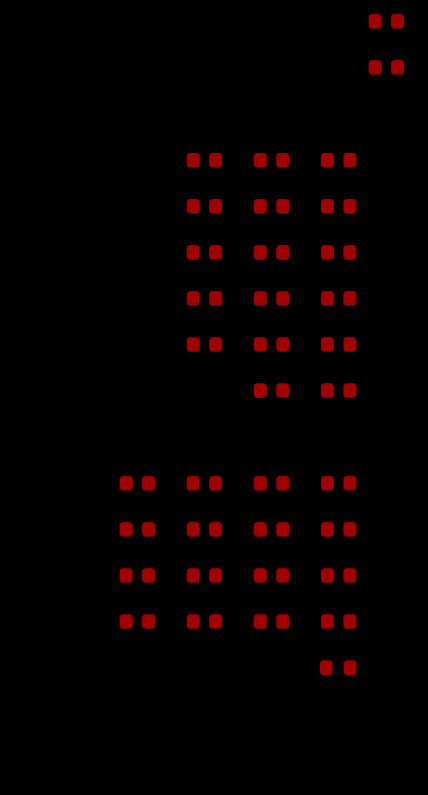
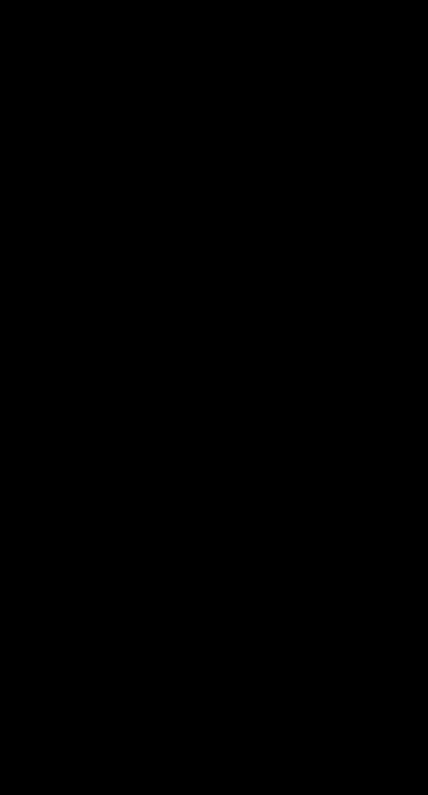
part: (386, 21) -> none
part: (386, 67) -> none
part: (204, 160) -> none
part: (271, 160) -> none
part: (338, 160) -> none
part: (204, 206) -> none
part: (271, 206) -> none
part: (338, 206) -> none
part: (204, 252) -> none
part: (271, 252) -> none
part: (338, 252) -> none
part: (204, 298) -> none
part: (271, 298) -> none
part: (338, 298) -> none
part: (204, 344) -> none
part: (271, 344) -> none
part: (338, 344) -> none
part: (271, 390) -> none
part: (338, 390) -> none
part: (137, 483) -> none
part: (204, 483) -> none
part: (271, 483) -> none
part: (338, 483) -> none
part: (137, 529) -> none
part: (204, 529) -> none
part: (271, 529) -> none
part: (338, 529) -> none
part: (137, 575) -> none
part: (204, 575) -> none
part: (271, 575) -> none
part: (338, 575) -> none
part: (137, 621) -> none
part: (204, 621) -> none
part: (271, 621) -> none
part: (338, 621) -> none
part: (338, 667) -> none

